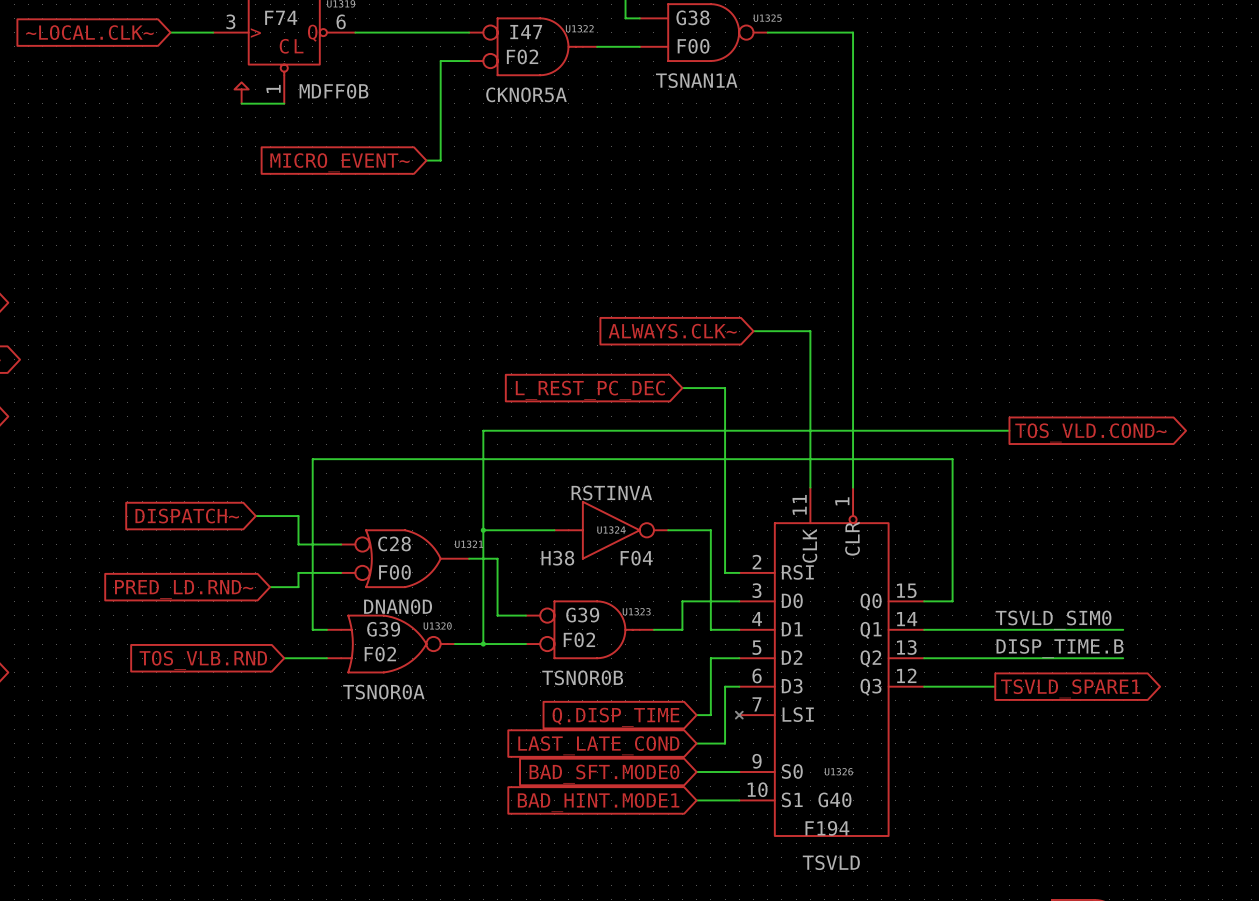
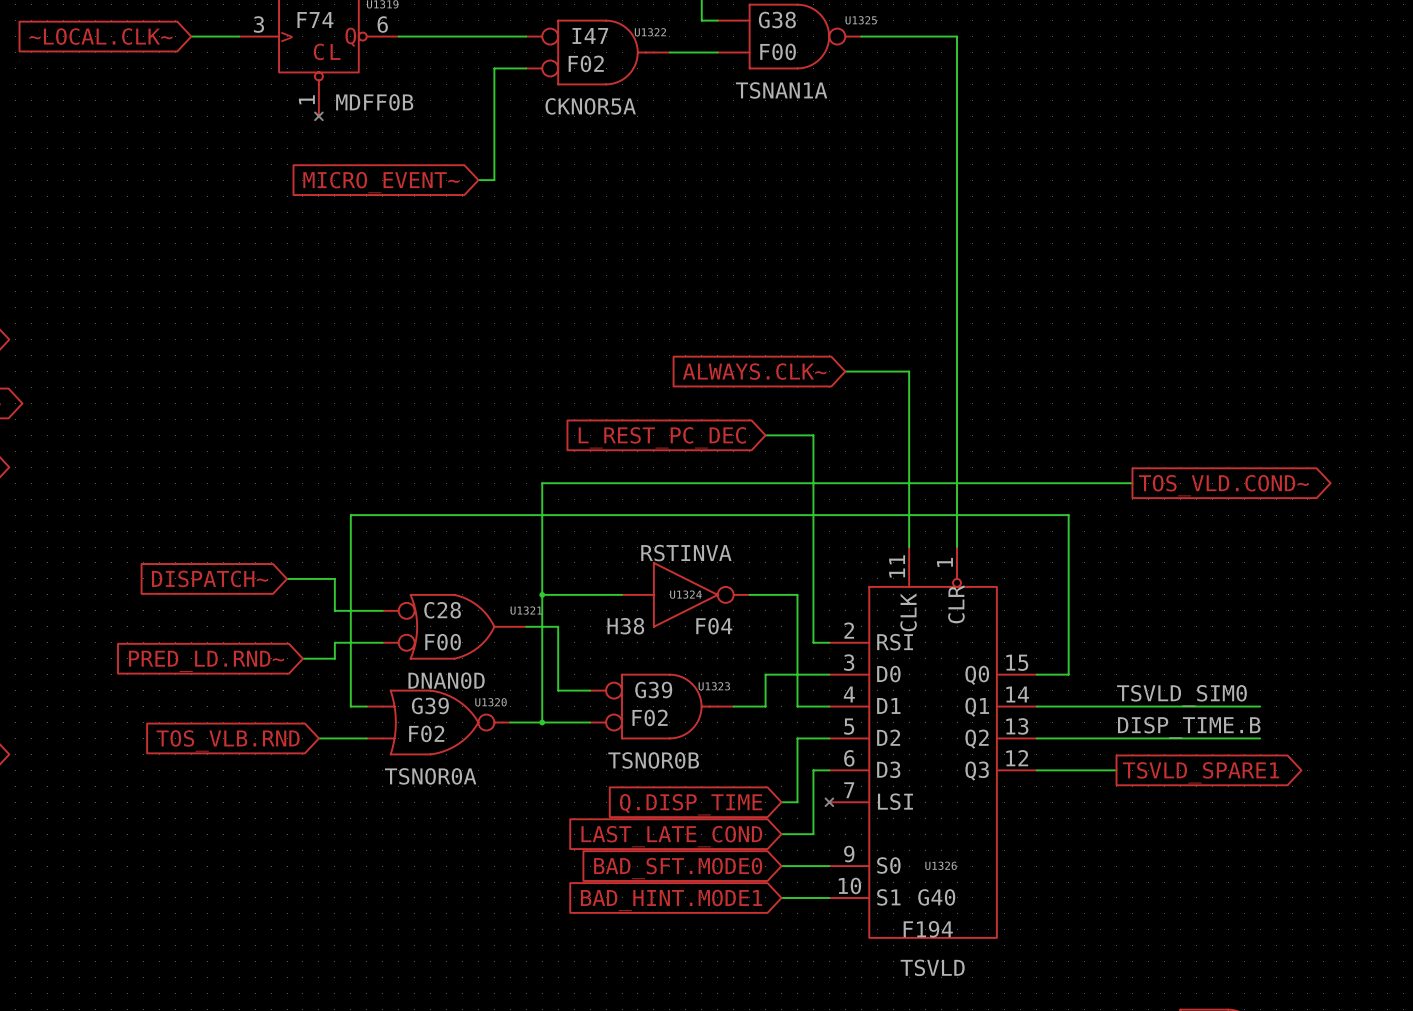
power symbol: (241, 92) -> none
wire: (241, 103) (284, 103) -> none
no-connect mark: none -> (318, 116)

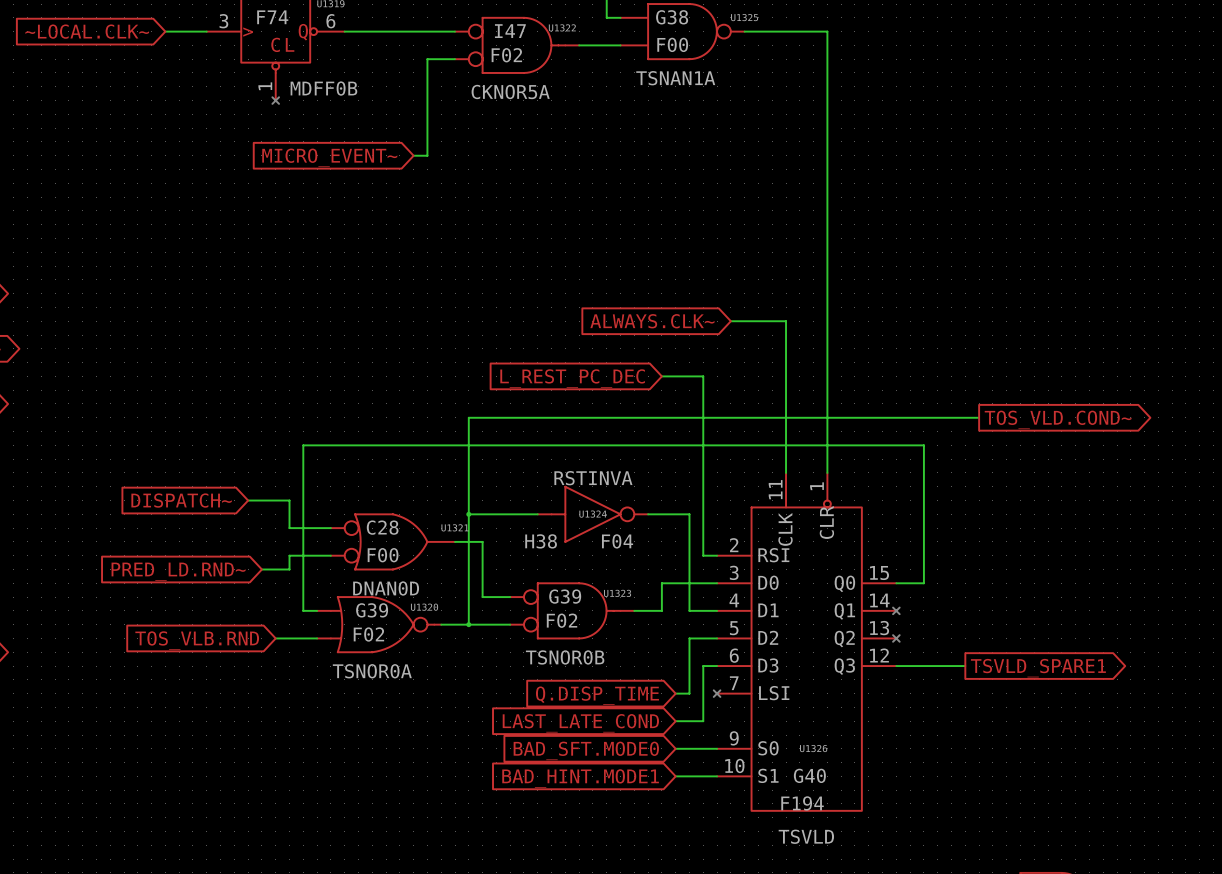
label: TSVLD_SIM0 (1181, 695) -> none
wire: (1036, 706) (1260, 706) -> none
no-connect mark: none -> (896, 610)
label: DISP_TIME.B (1189, 727) -> none
wire: (1036, 738) (1260, 738) -> none
no-connect mark: none -> (896, 638)

